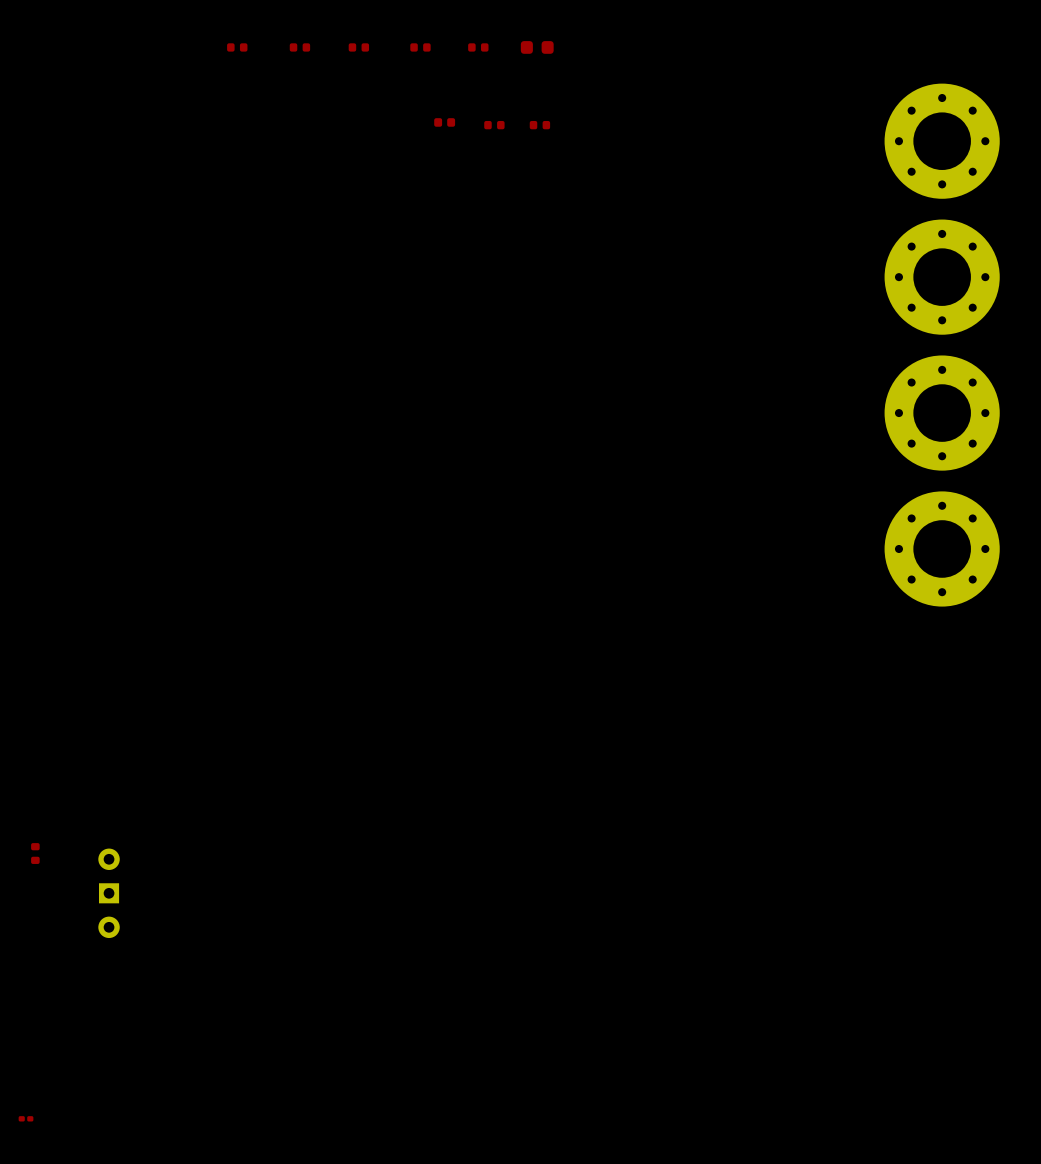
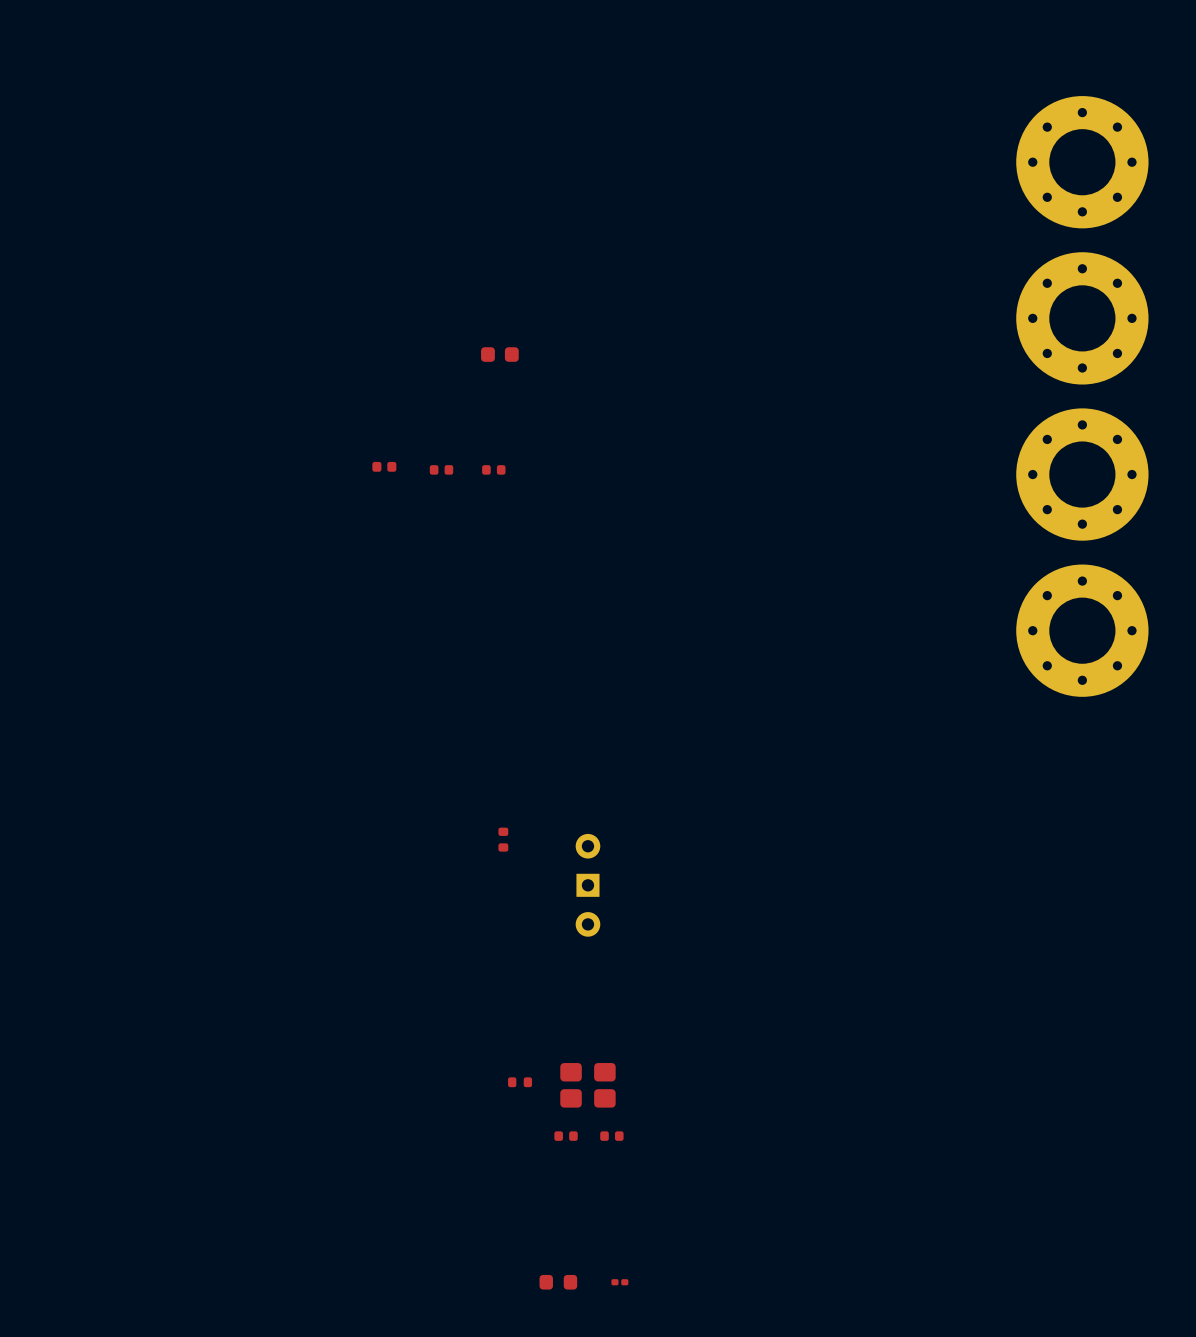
part: (237, 47) -> none
part: (299, 47) -> none
part: (358, 47) -> none
part: (420, 47) -> none
part: (478, 47) -> none
part position: (537, 47) -> (499, 354)
part position: (444, 122) -> (384, 466)
part: (494, 125) -> none
part: (539, 125) -> none
part: none -> (441, 469)
part: none -> (493, 469)
part: none -> (503, 839)
part: none -> (587, 885)
part: (35, 853) -> none
part: (109, 893) -> none
part: none -> (520, 1082)
part: none -> (587, 1085)
part: none -> (566, 1136)
part: none -> (611, 1136)
part: none -> (558, 1282)
part: none -> (619, 1282)
part: (26, 1118) -> none

